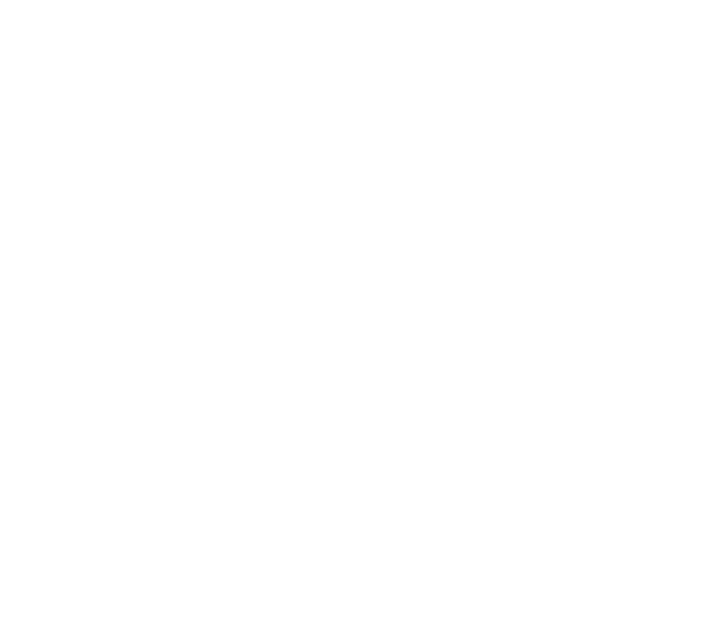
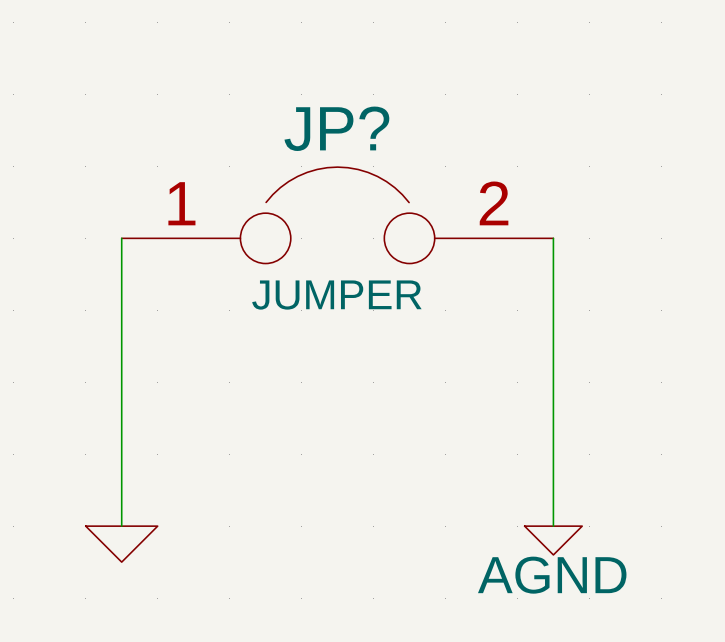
JP?: none -> JUMPER (337, 215)
wire: none -> (121, 238) (121, 526)
wire: none -> (553, 238) (553, 526)
power symbol: none -> AGND (553, 540)
power symbol: none -> (121, 544)

